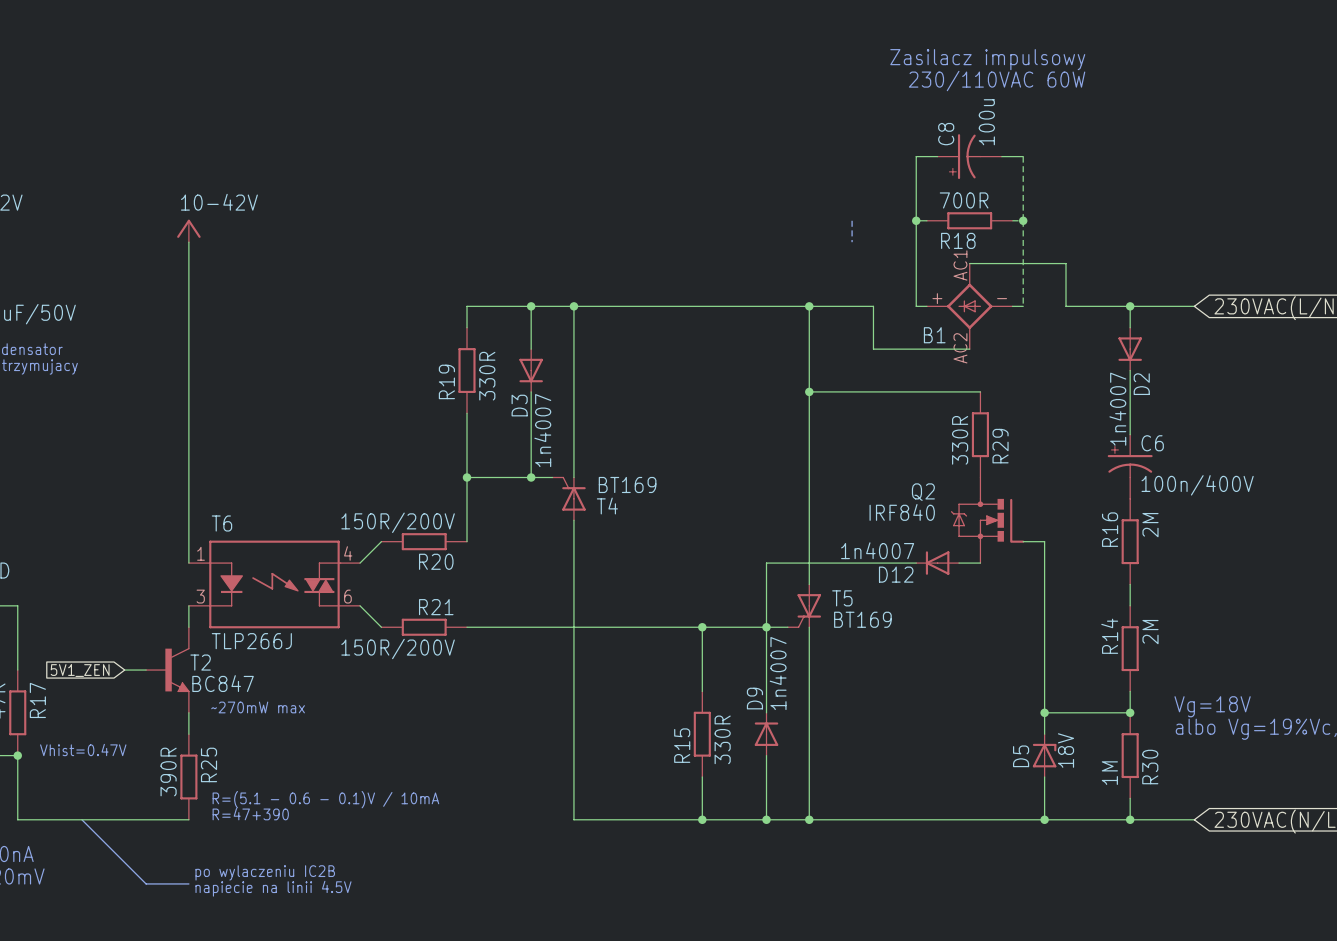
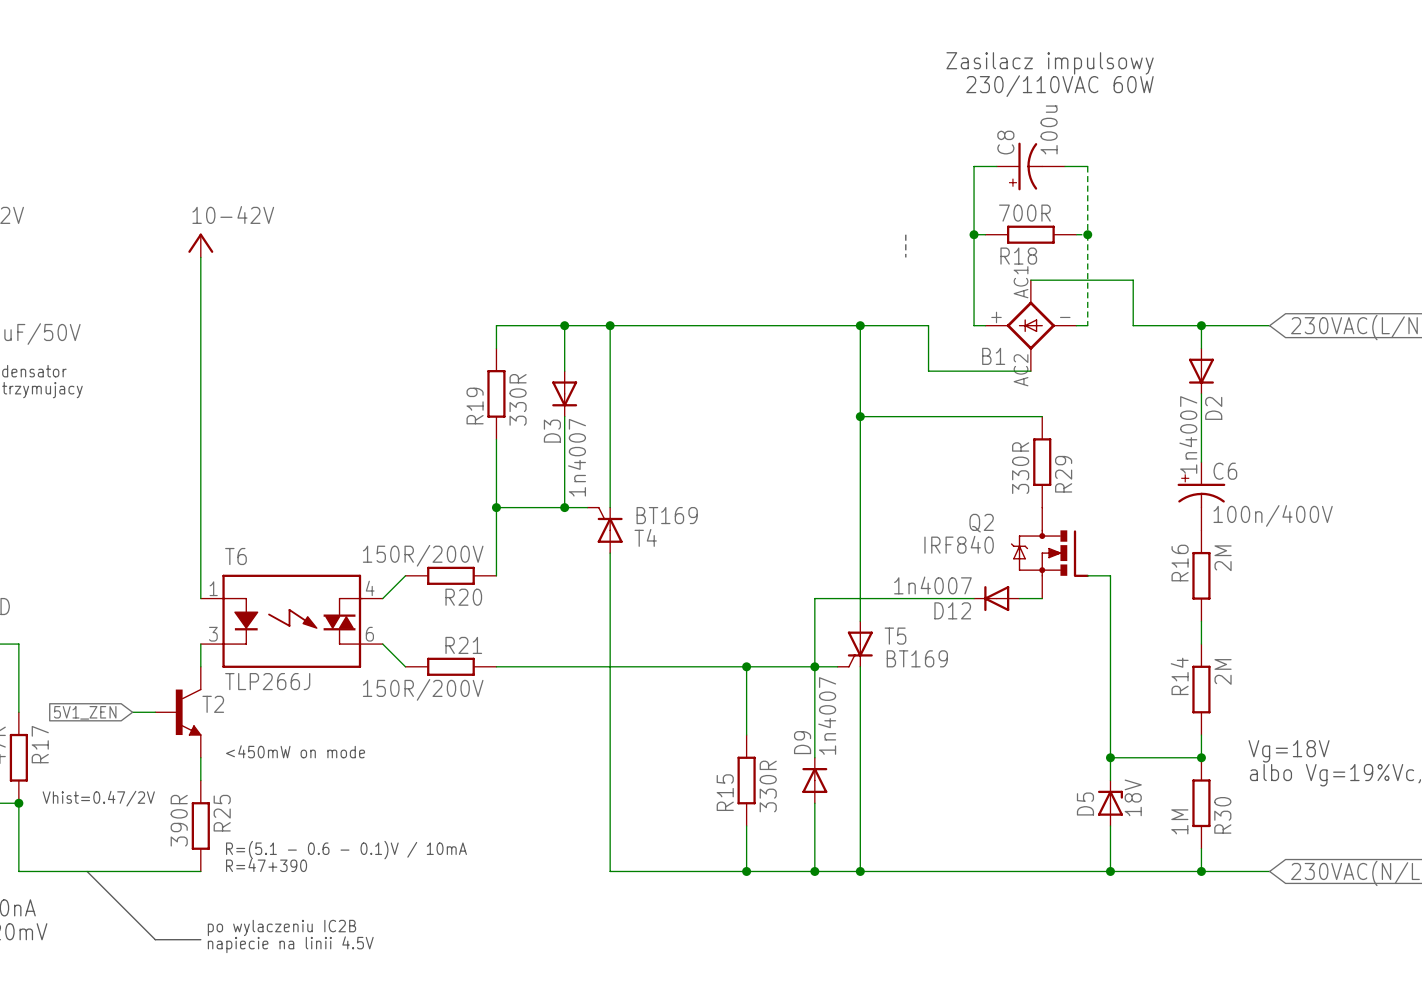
T2 value: BC847 (223, 683) -> none
text: ~270mW max (258, 707) -> <450mW on mode (295, 751)
text: Vhist=0.47V (83, 750) -> Vhist=0.47/2V (98, 798)

